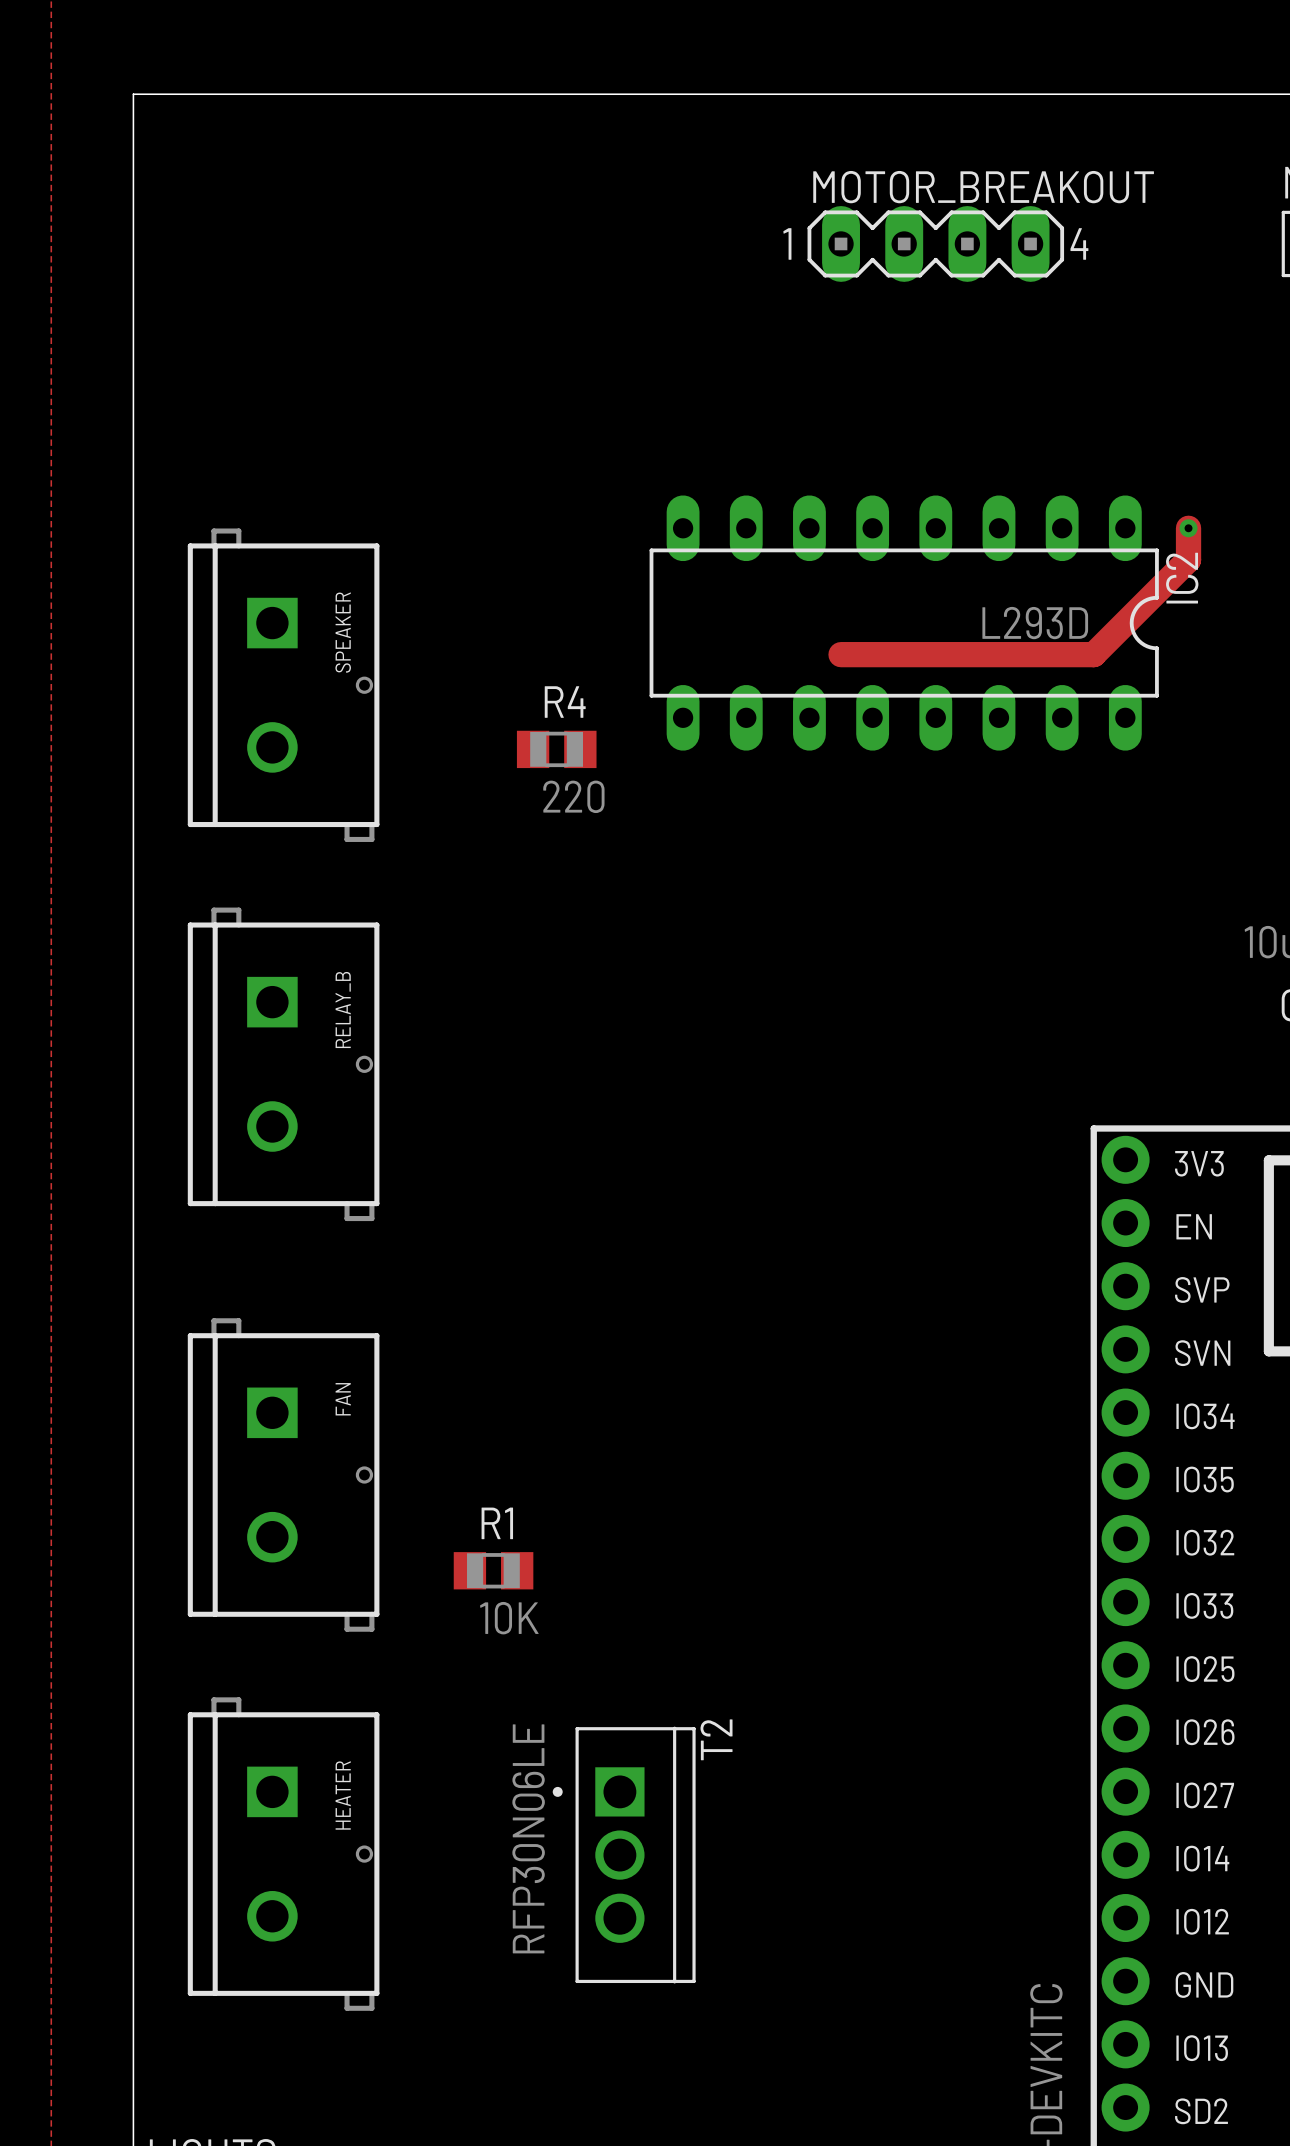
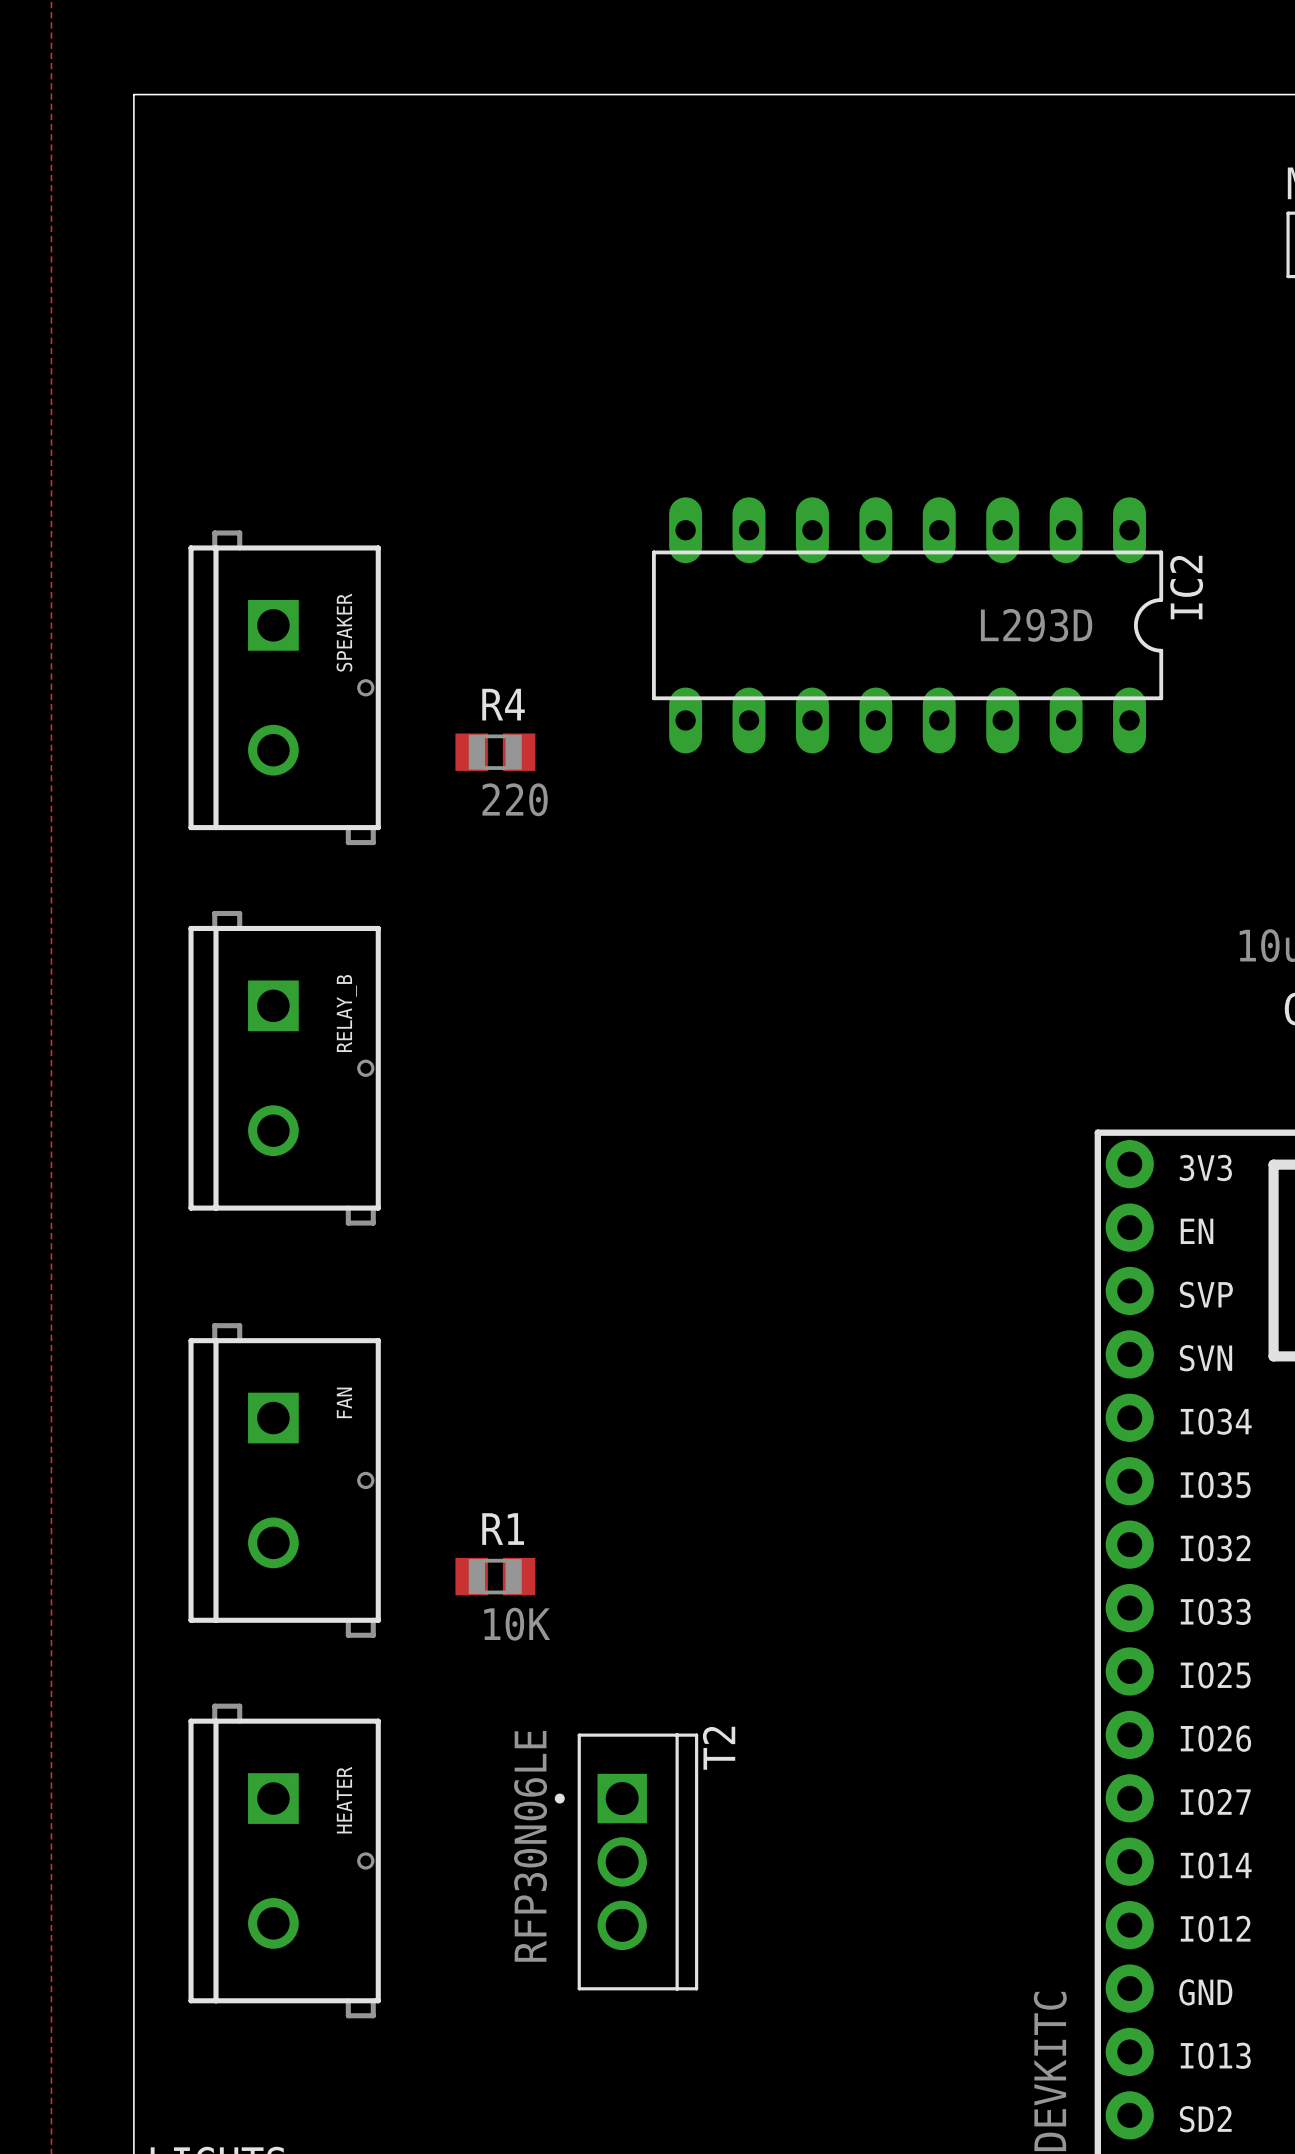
MOTOR_BREAKOUT: (935, 243) -> none
track: (1188, 528) (1188, 559) (1093, 654) (841, 654) -> none
via: (1188, 528) -> none
R4 position: (556, 749) -> (495, 752)

